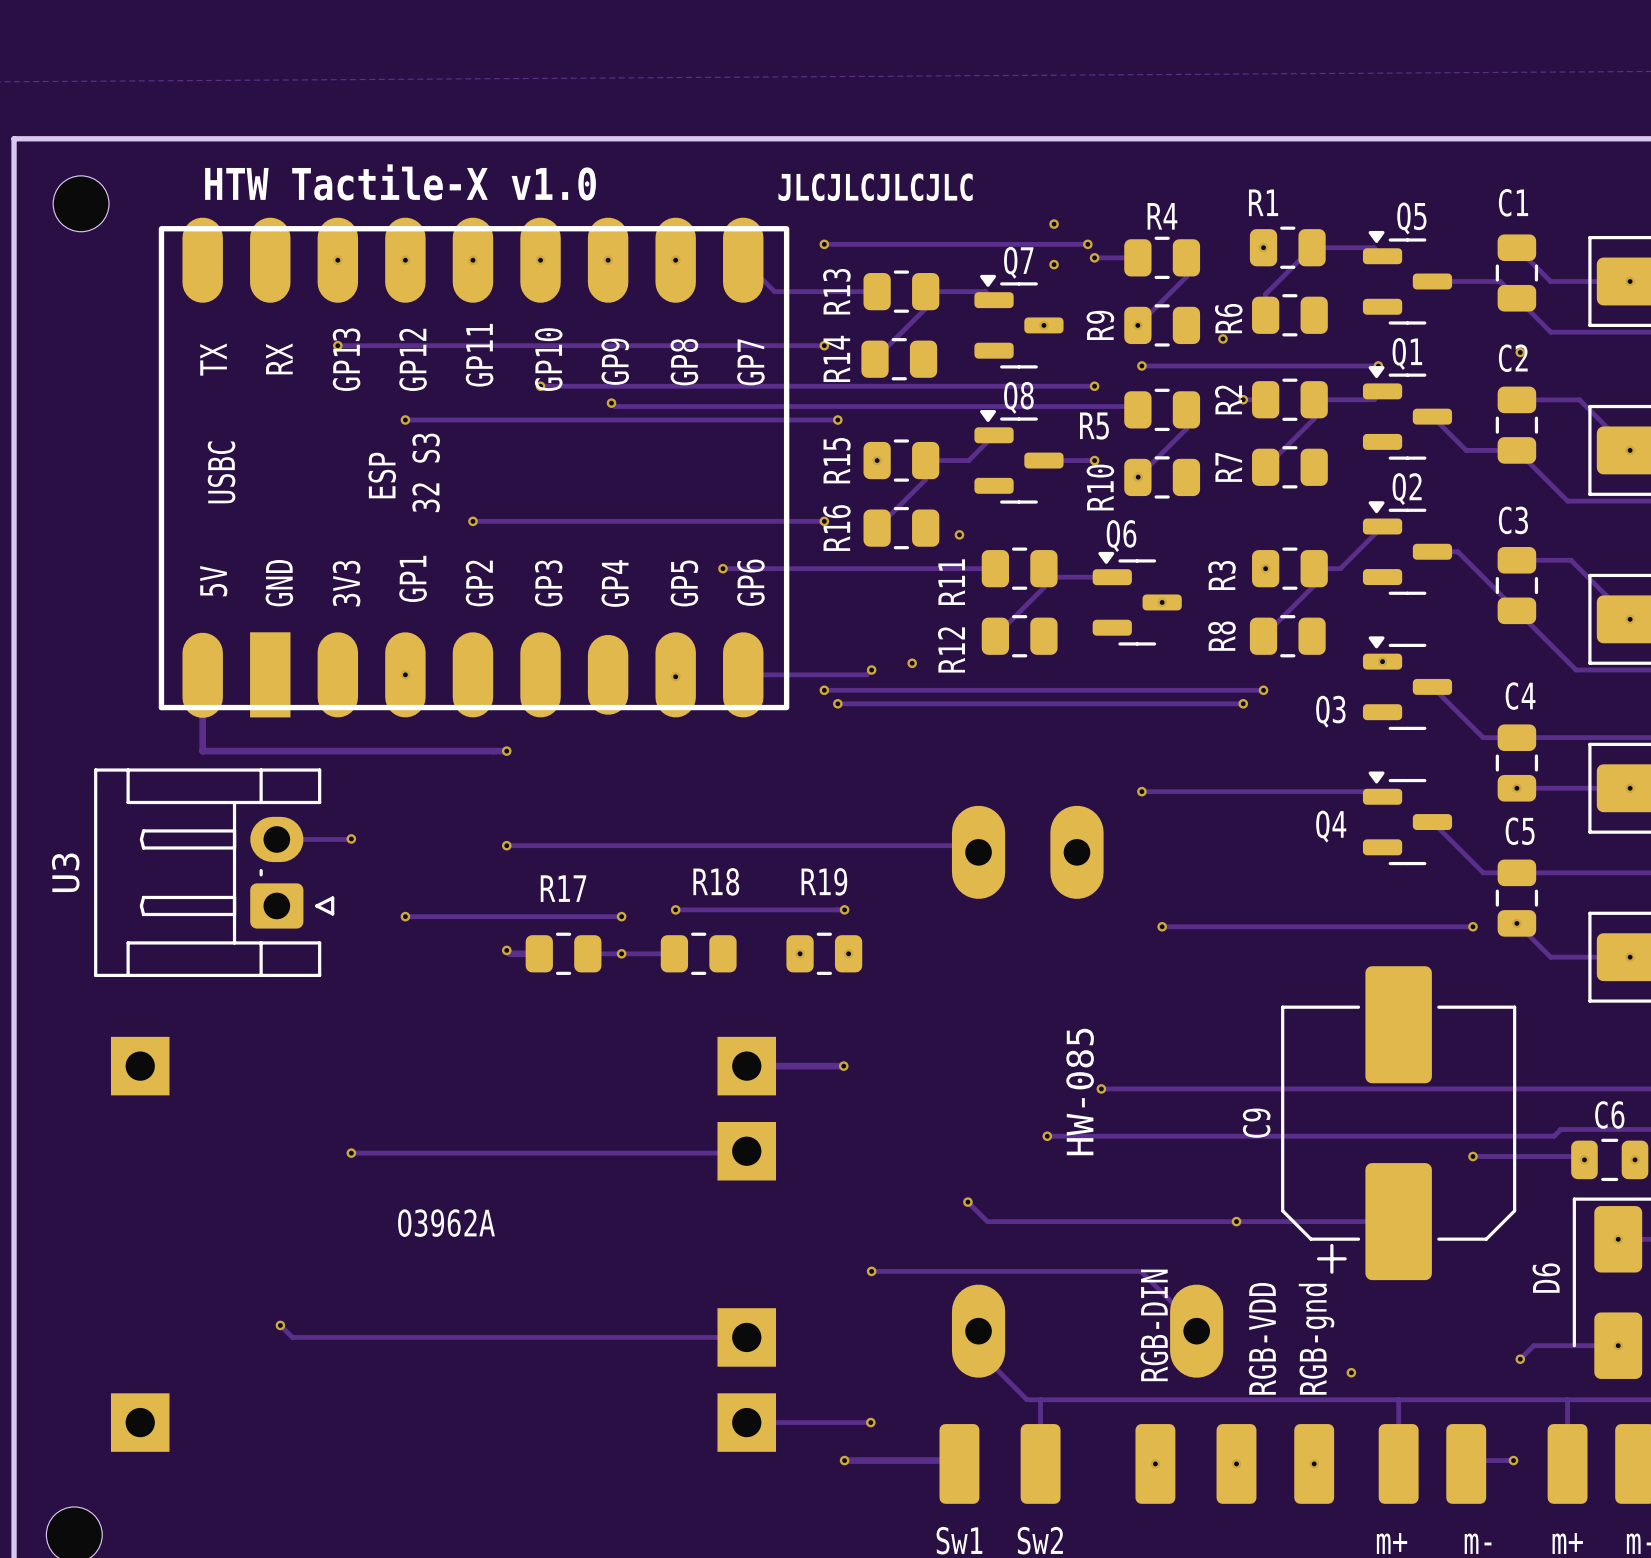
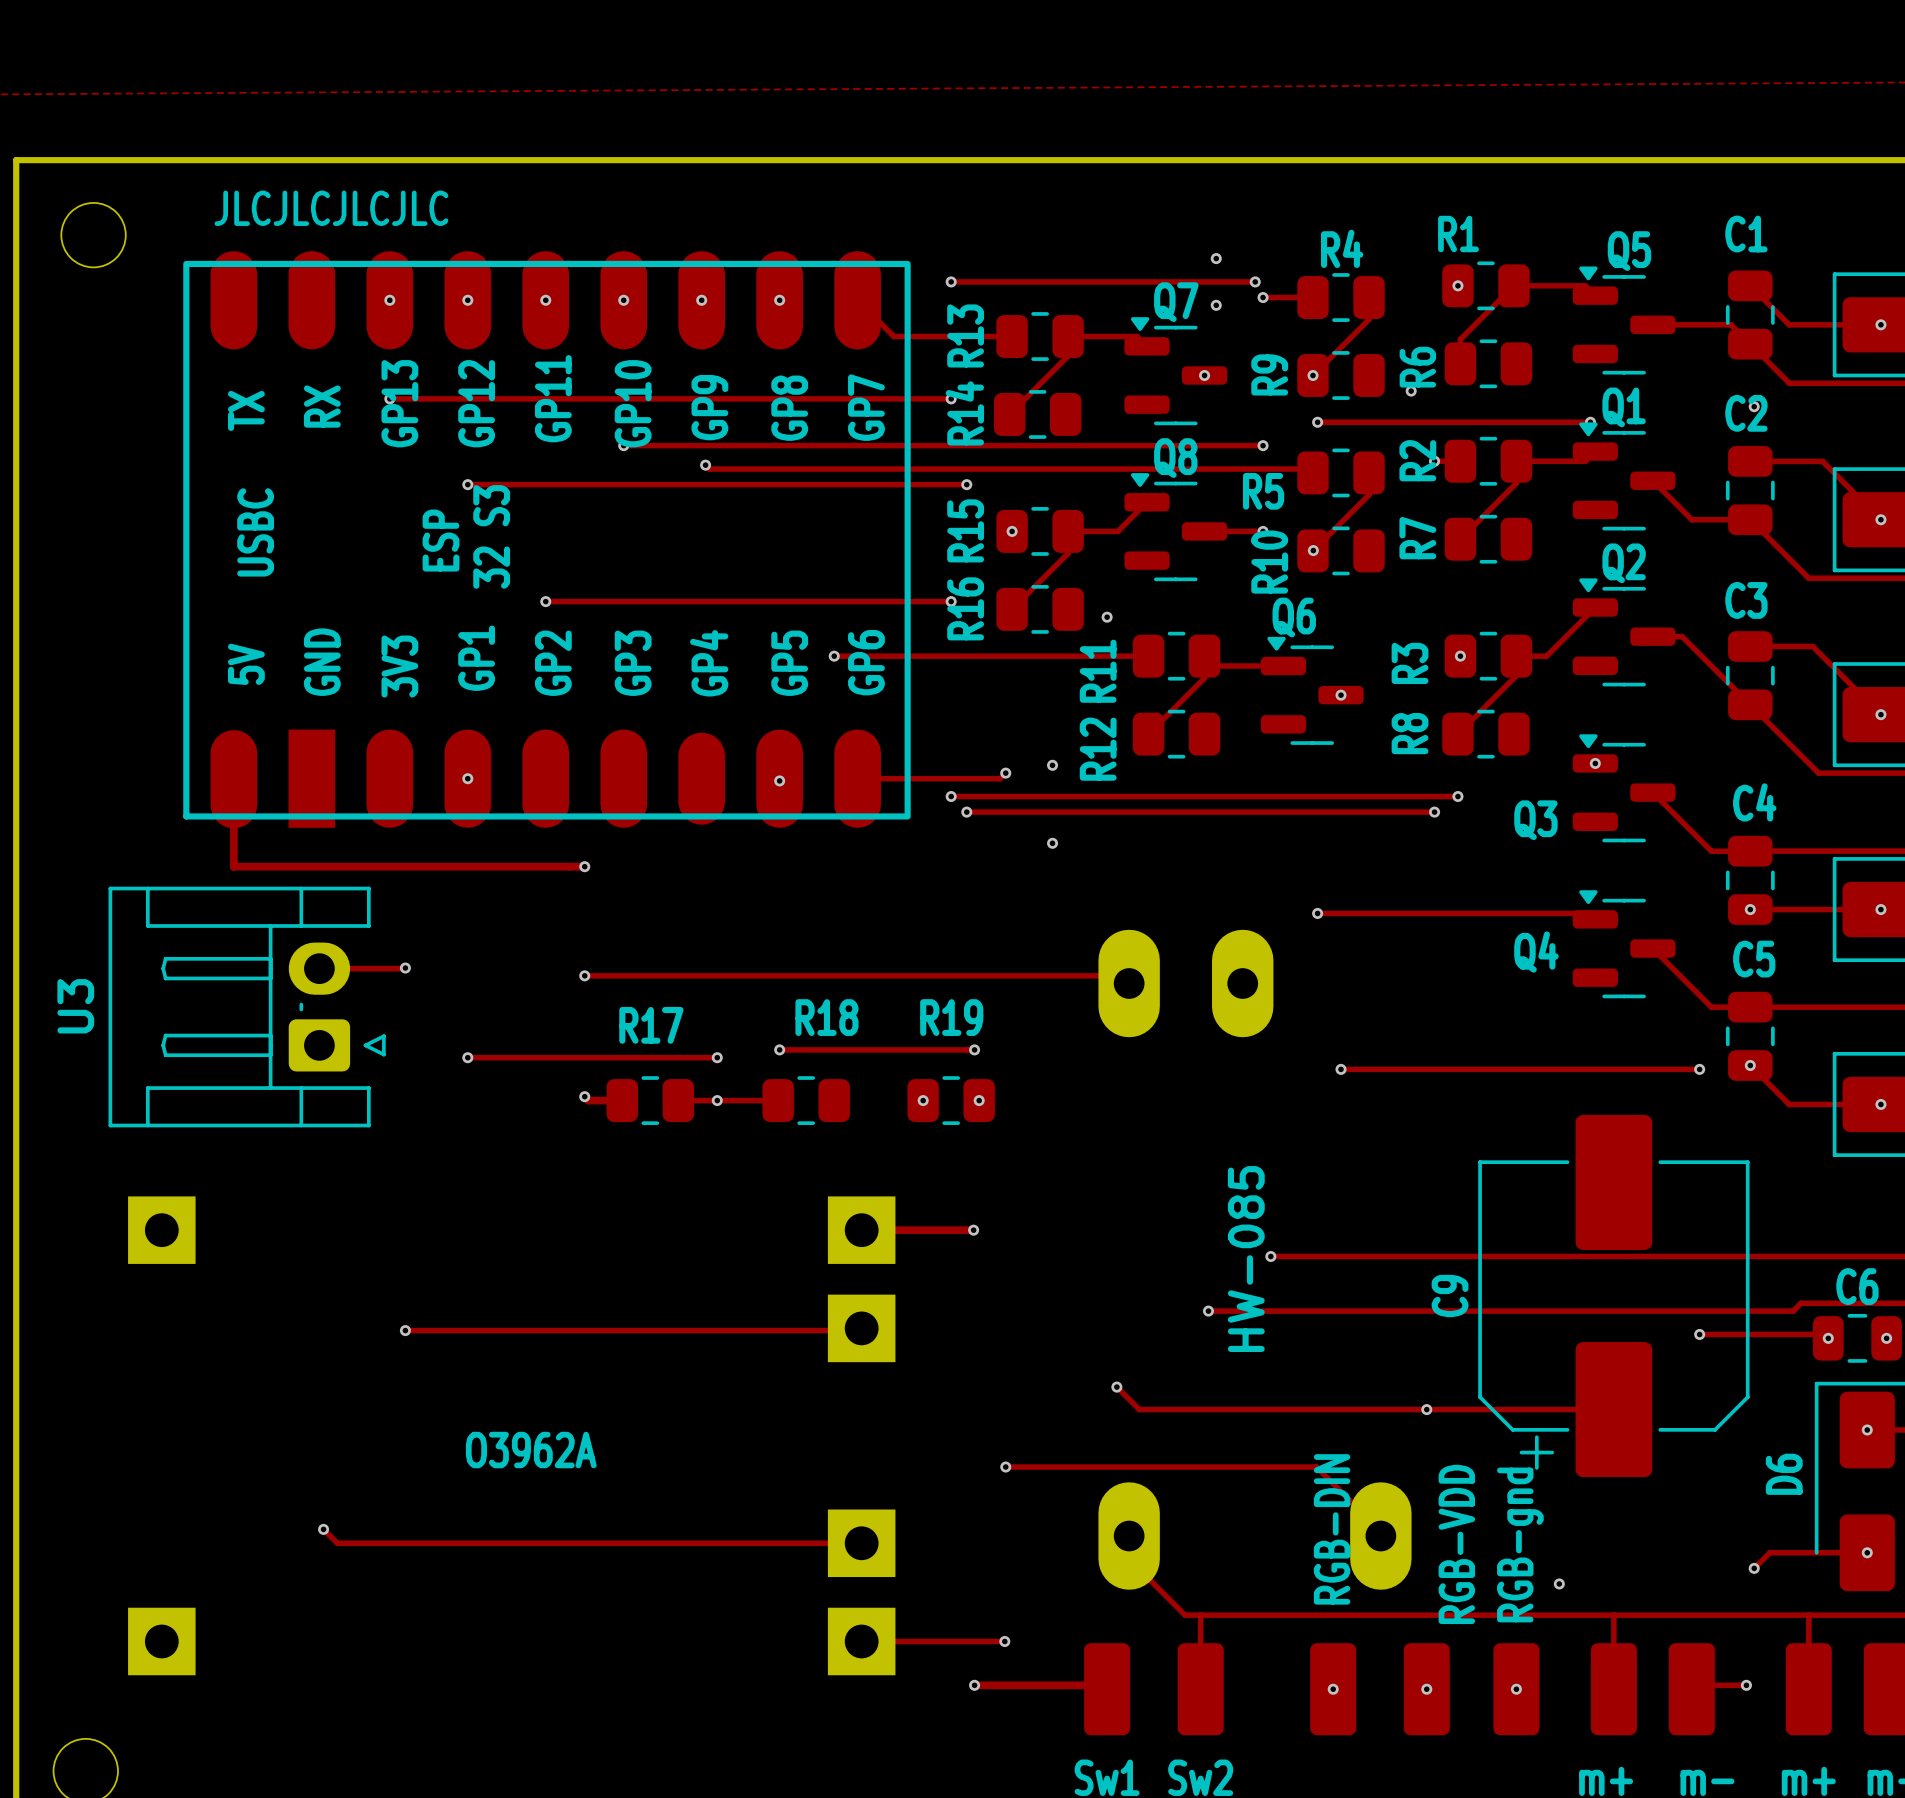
text: HTW Tactile-X v1.0 (400, 182) -> JLCJLCJLCJLC (331, 208)
text: JLCJLCJLCJLC (875, 187) -> none
via: none -> (1052, 843)
O3962A name position: O3962A (446, 1223) -> O3962A (531, 1450)

